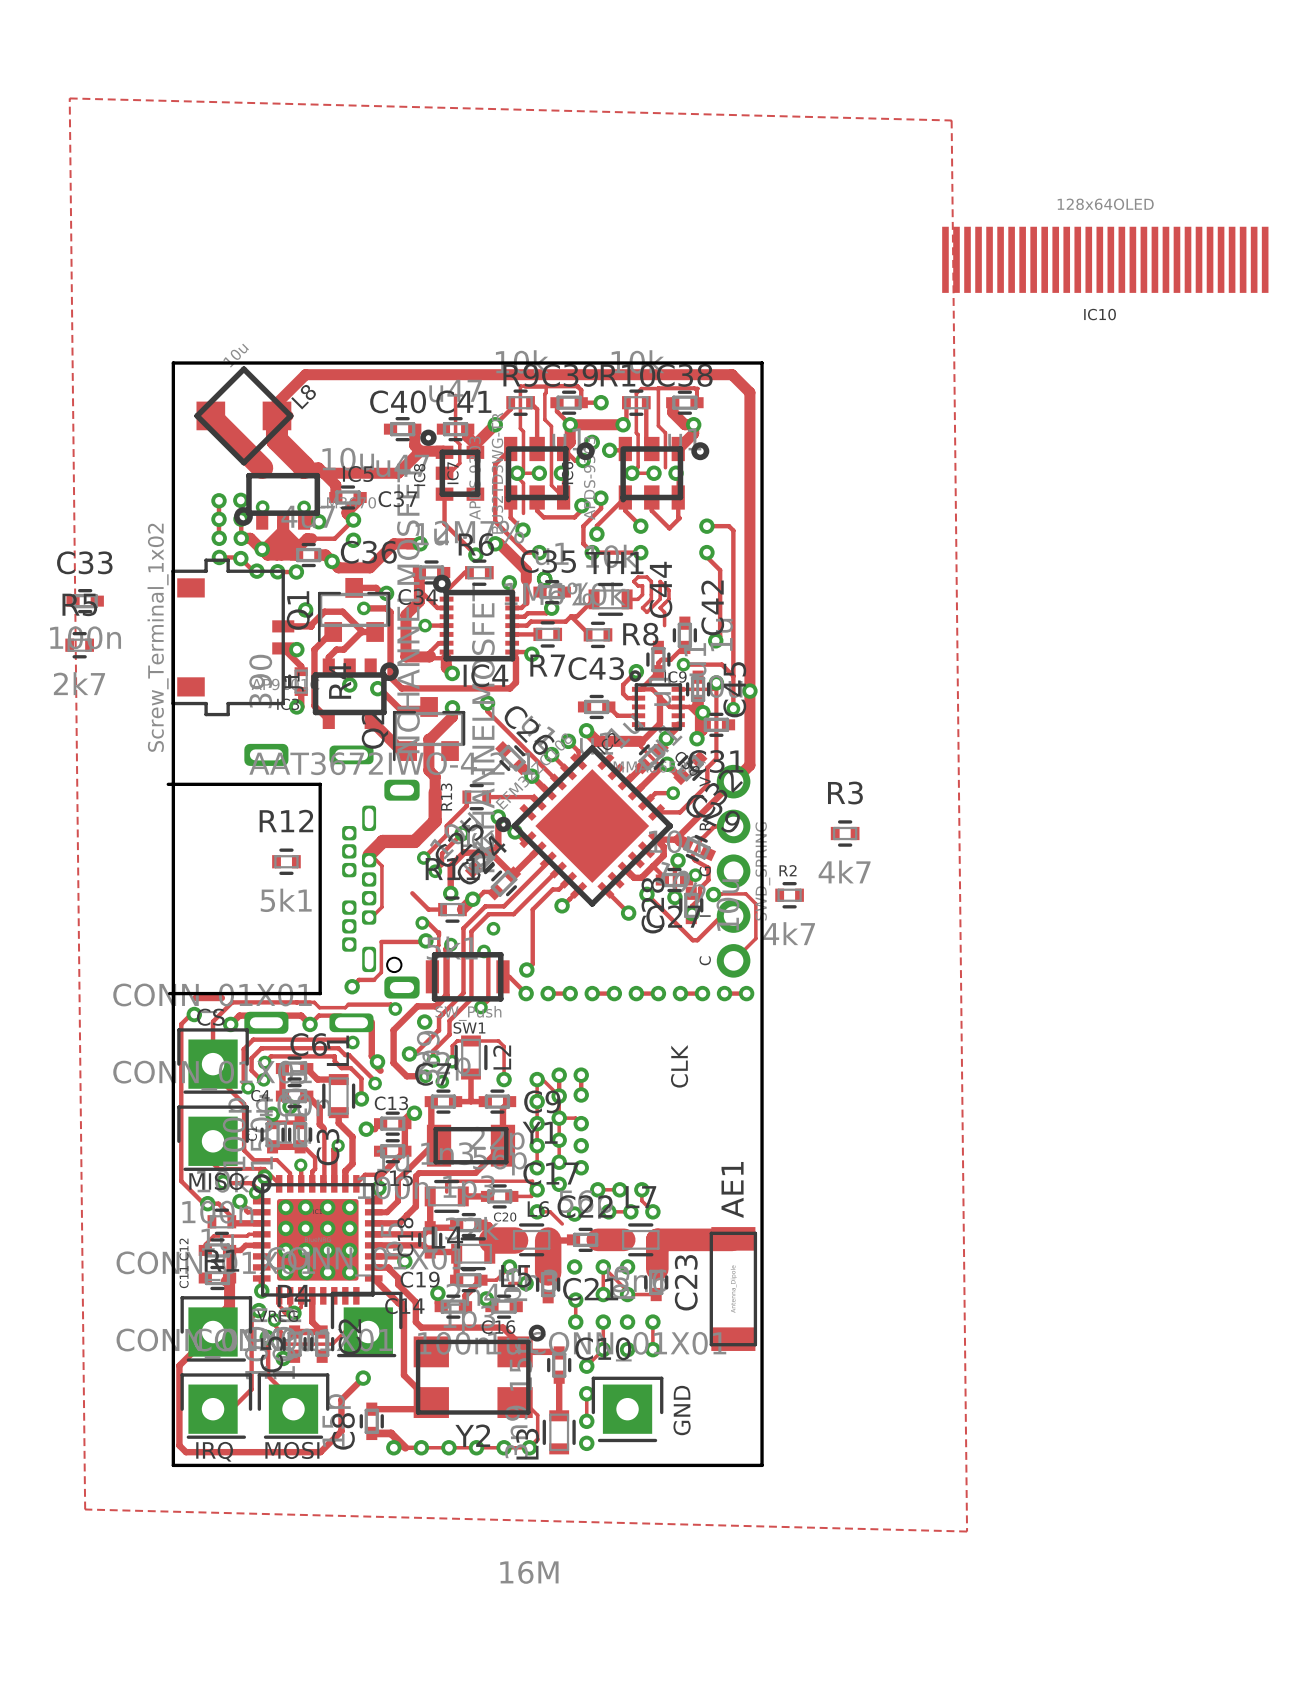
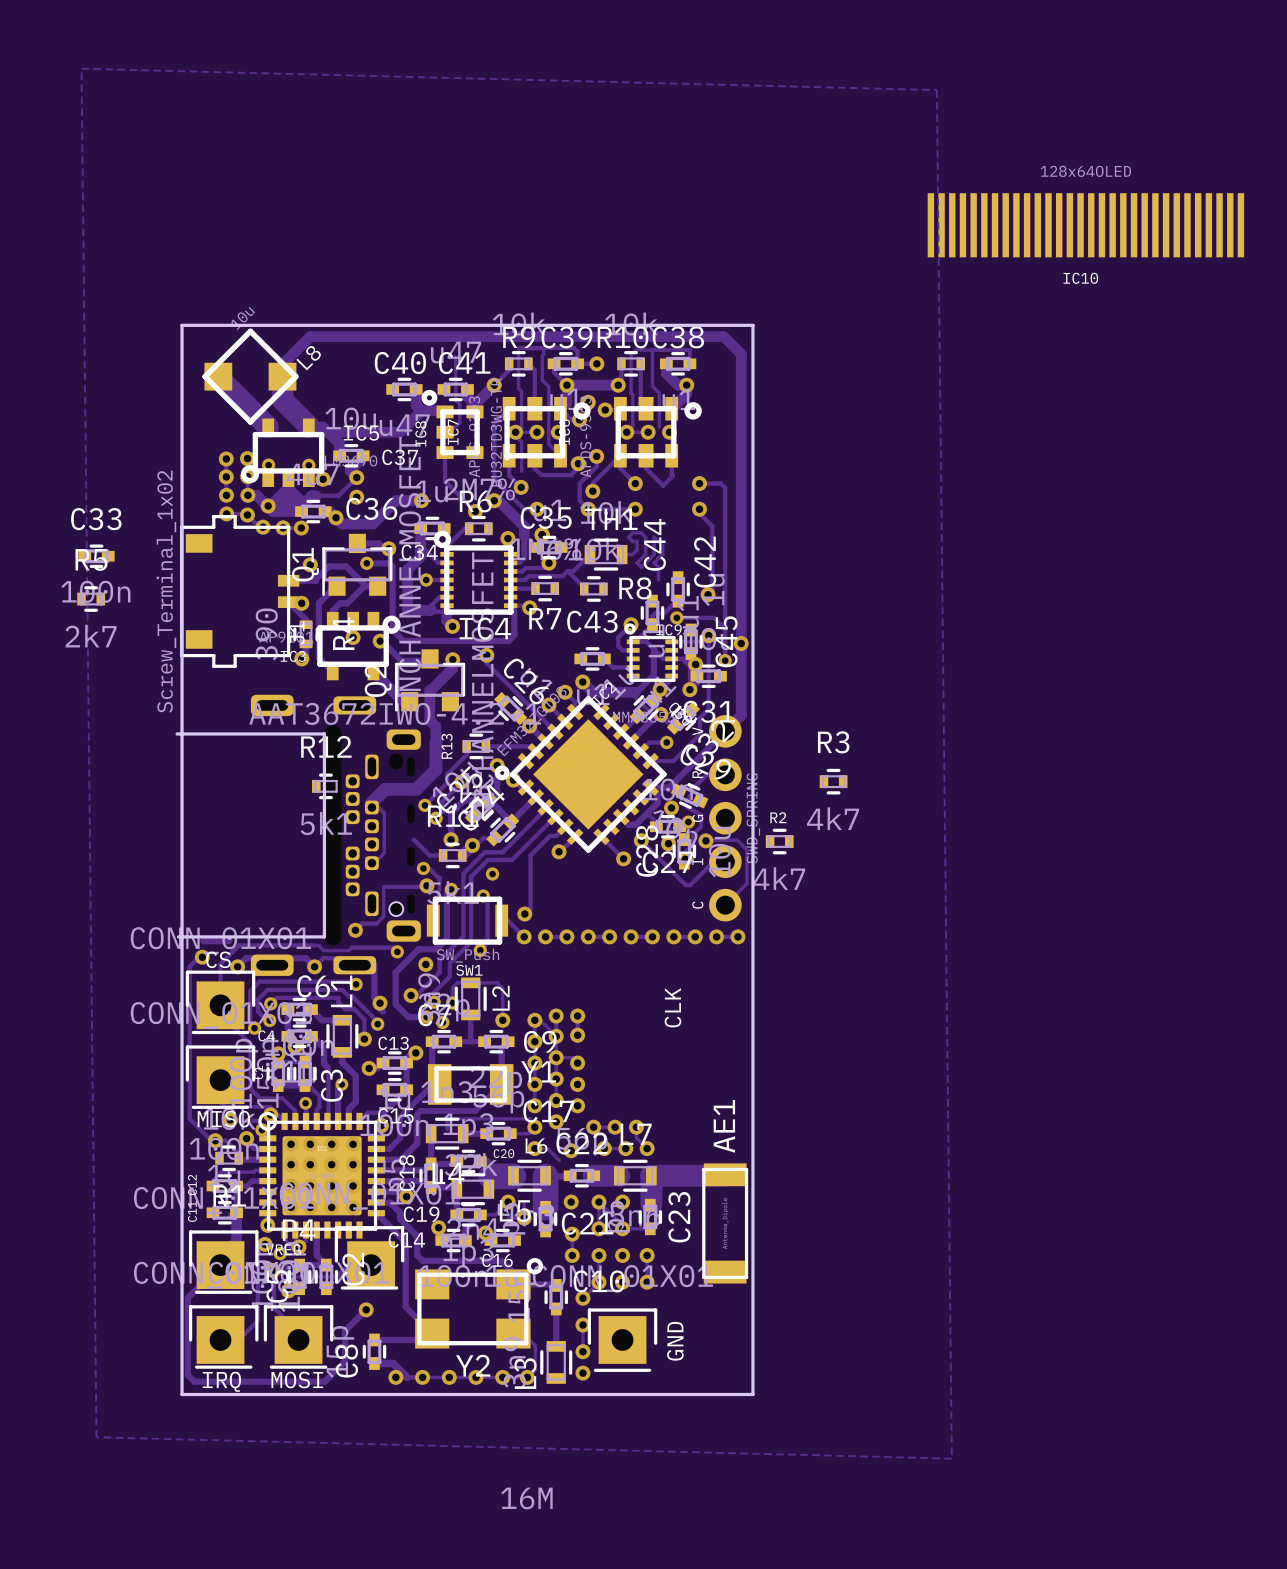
R12 position: (286, 861) -> (325, 786)

